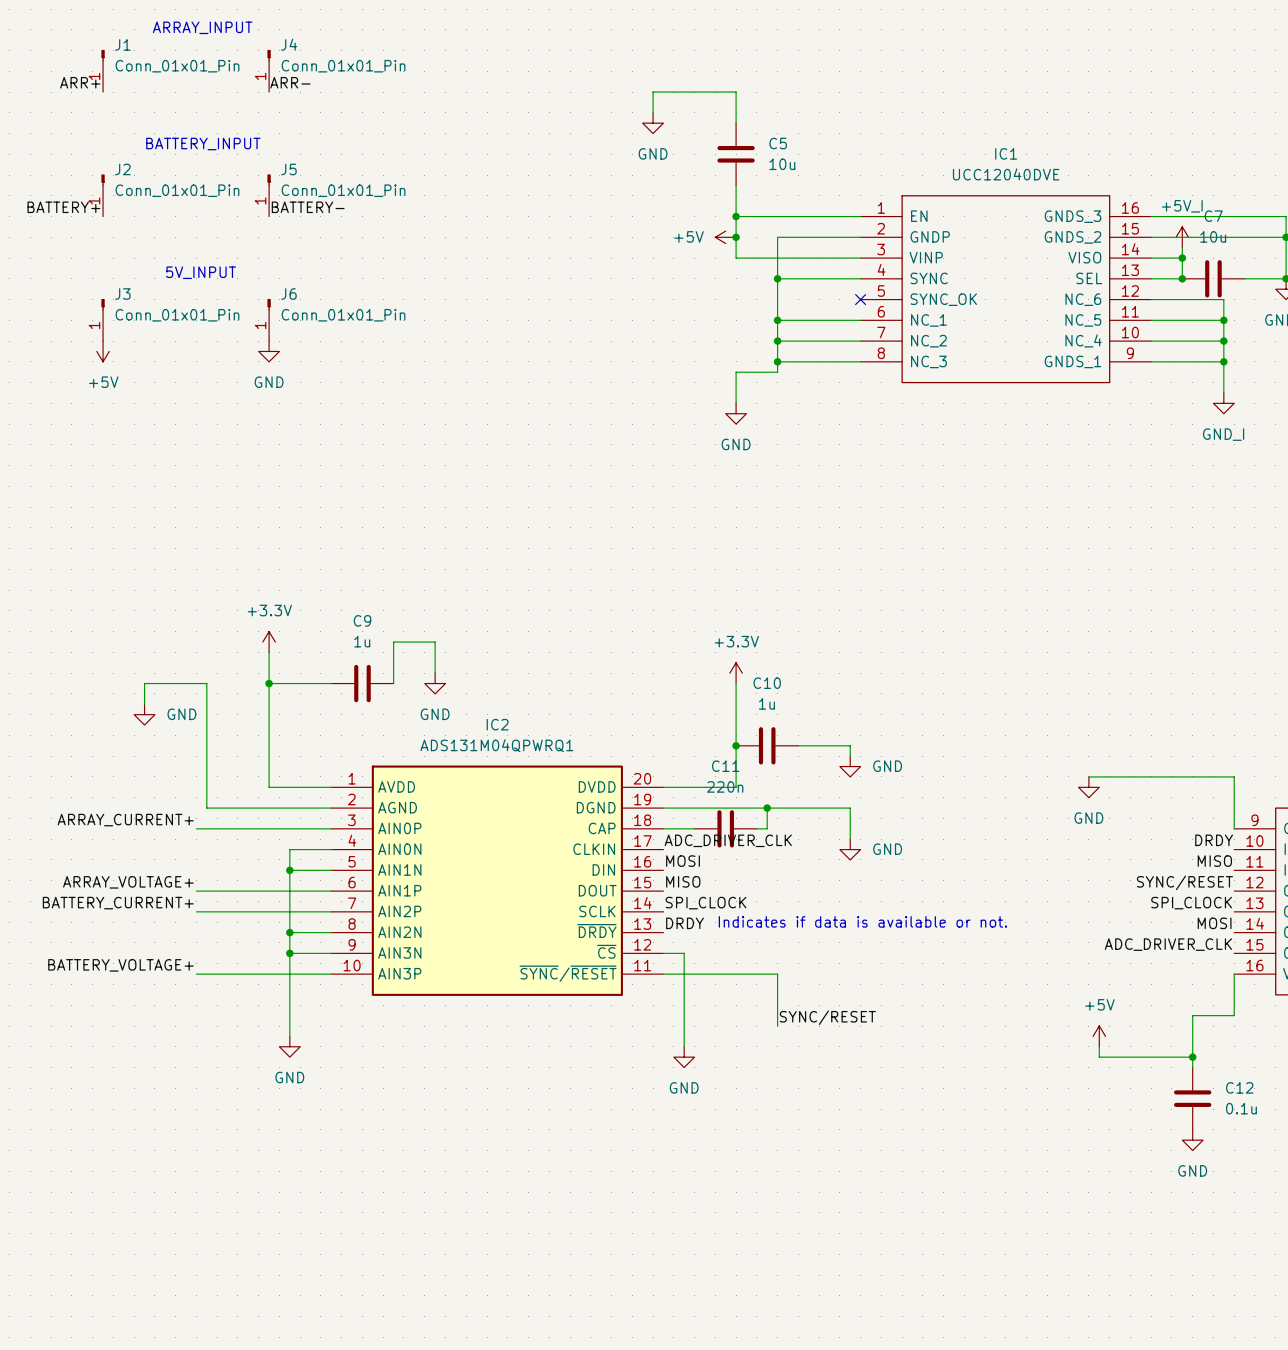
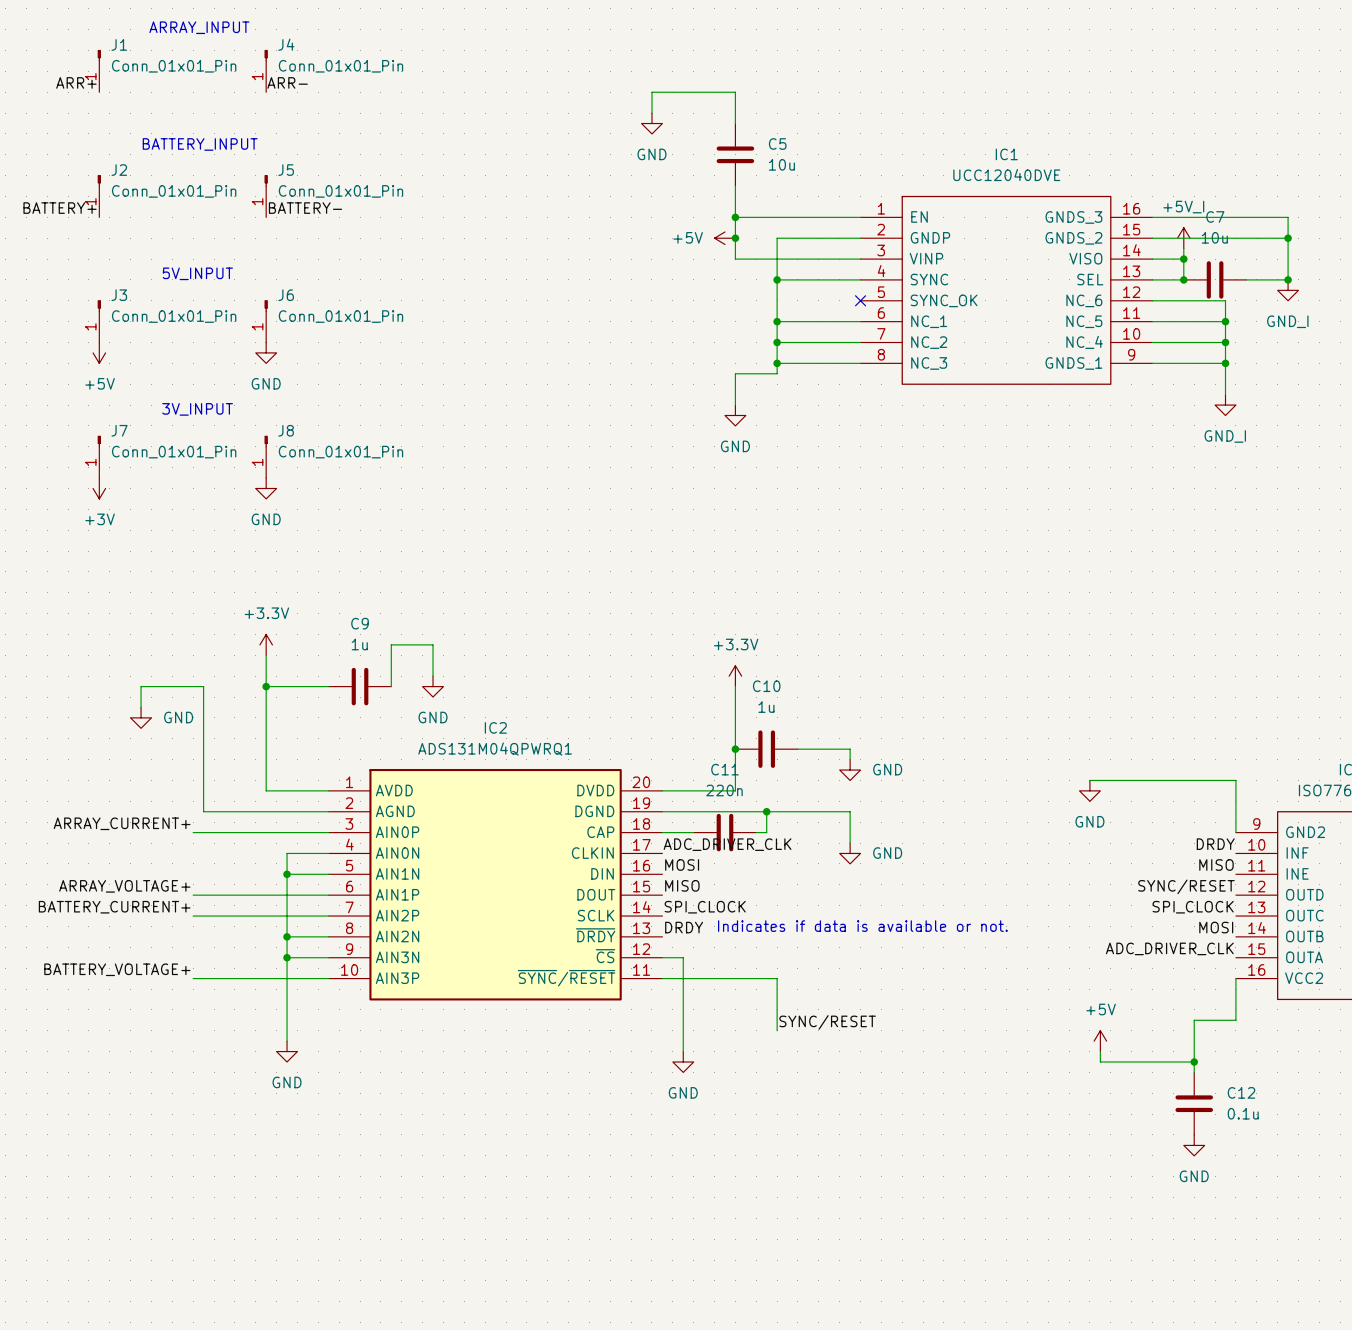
text: none -> 3V_INPUT (197, 409)
J7: none -> Conn_01x01_Pin (99, 456)
J8: none -> Conn_01x01_Pin (266, 456)
power symbol: none -> +3V (99, 488)
power symbol: none -> GND (266, 488)

